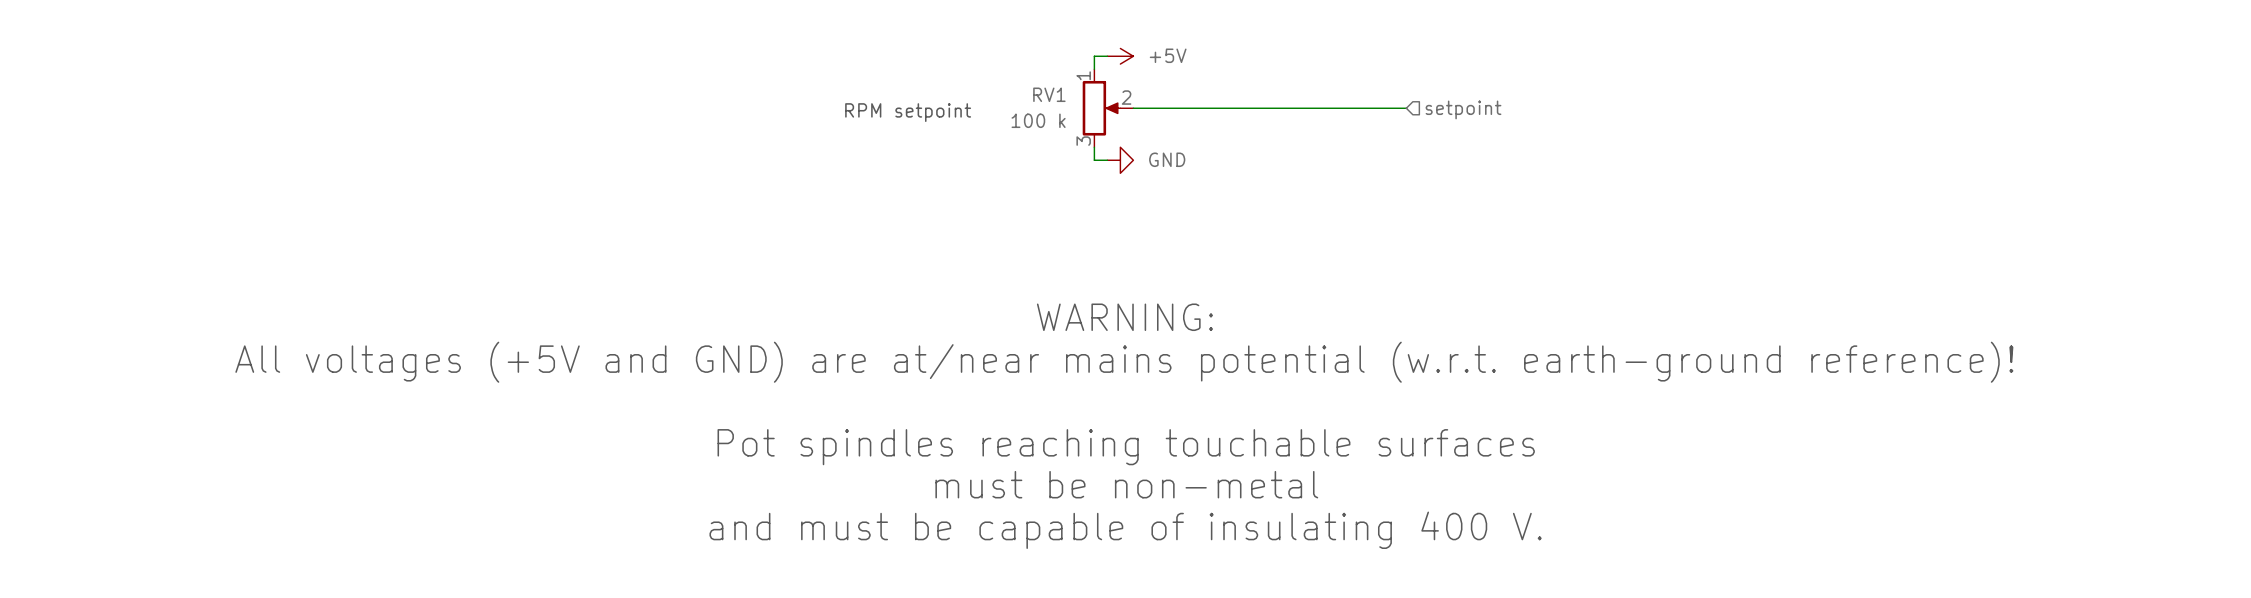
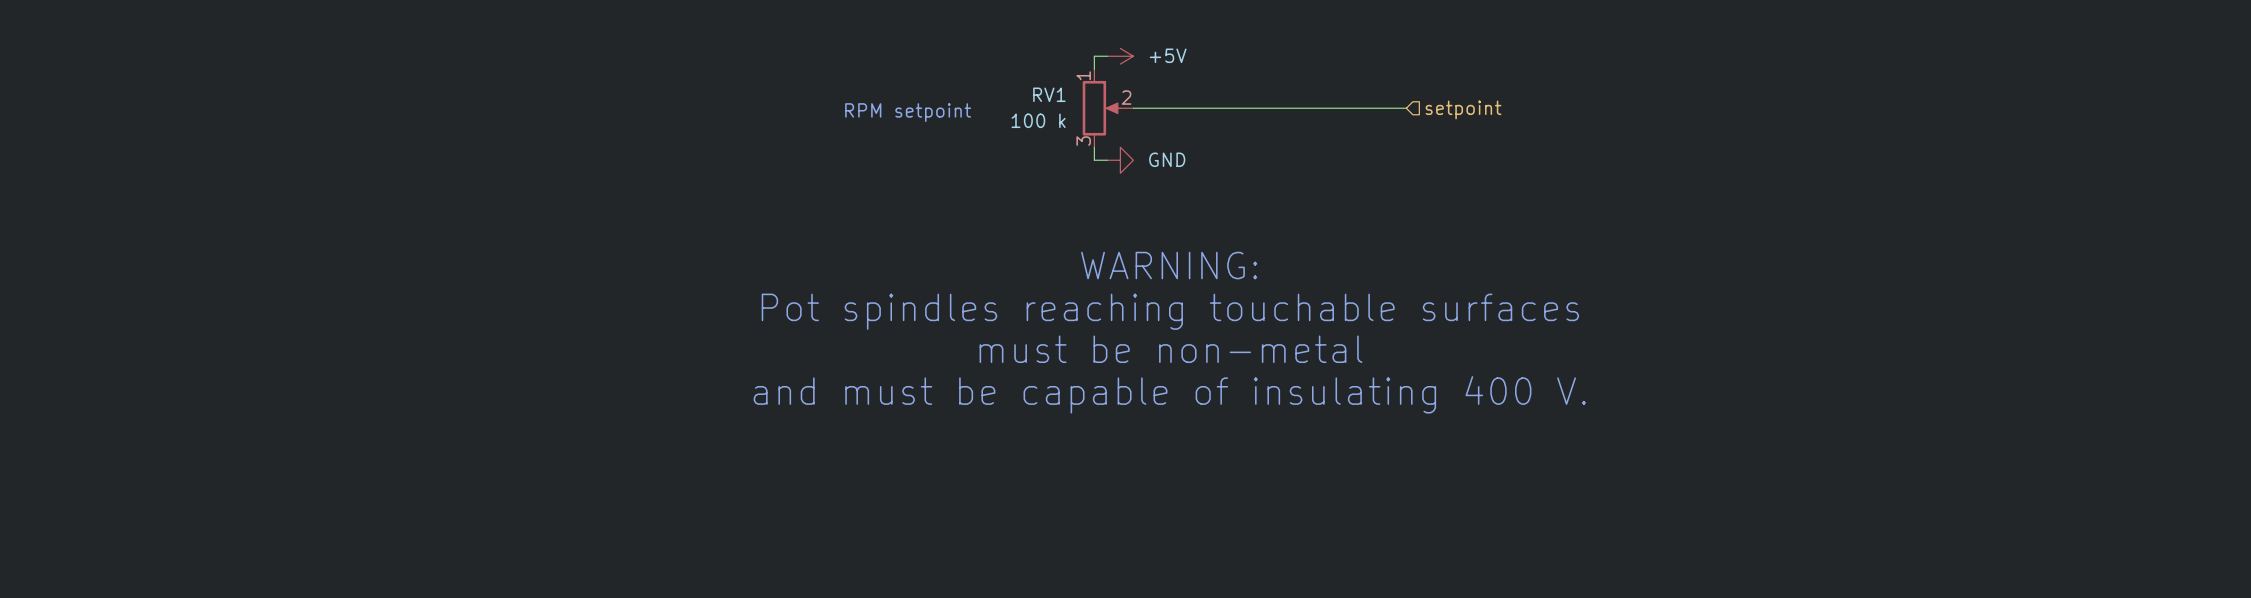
text position: WARNING: (1124, 317) -> WARNING: (1169, 265)
text: All voltages (+5V and GND) are at/near mains potential (w.r.t. earth-ground reference)! (1124, 362) -> none
text position: Pot spindles reaching touchable surfaces (1126, 447) -> Pot spindles reaching touchable surfaces (1170, 311)
text position: must be non-metal (1126, 484) -> must be non-metal (1171, 349)
text position: and must be capable of insulating 400 V. (1125, 530) -> and must be capable of insulating 400 V. (1169, 394)

